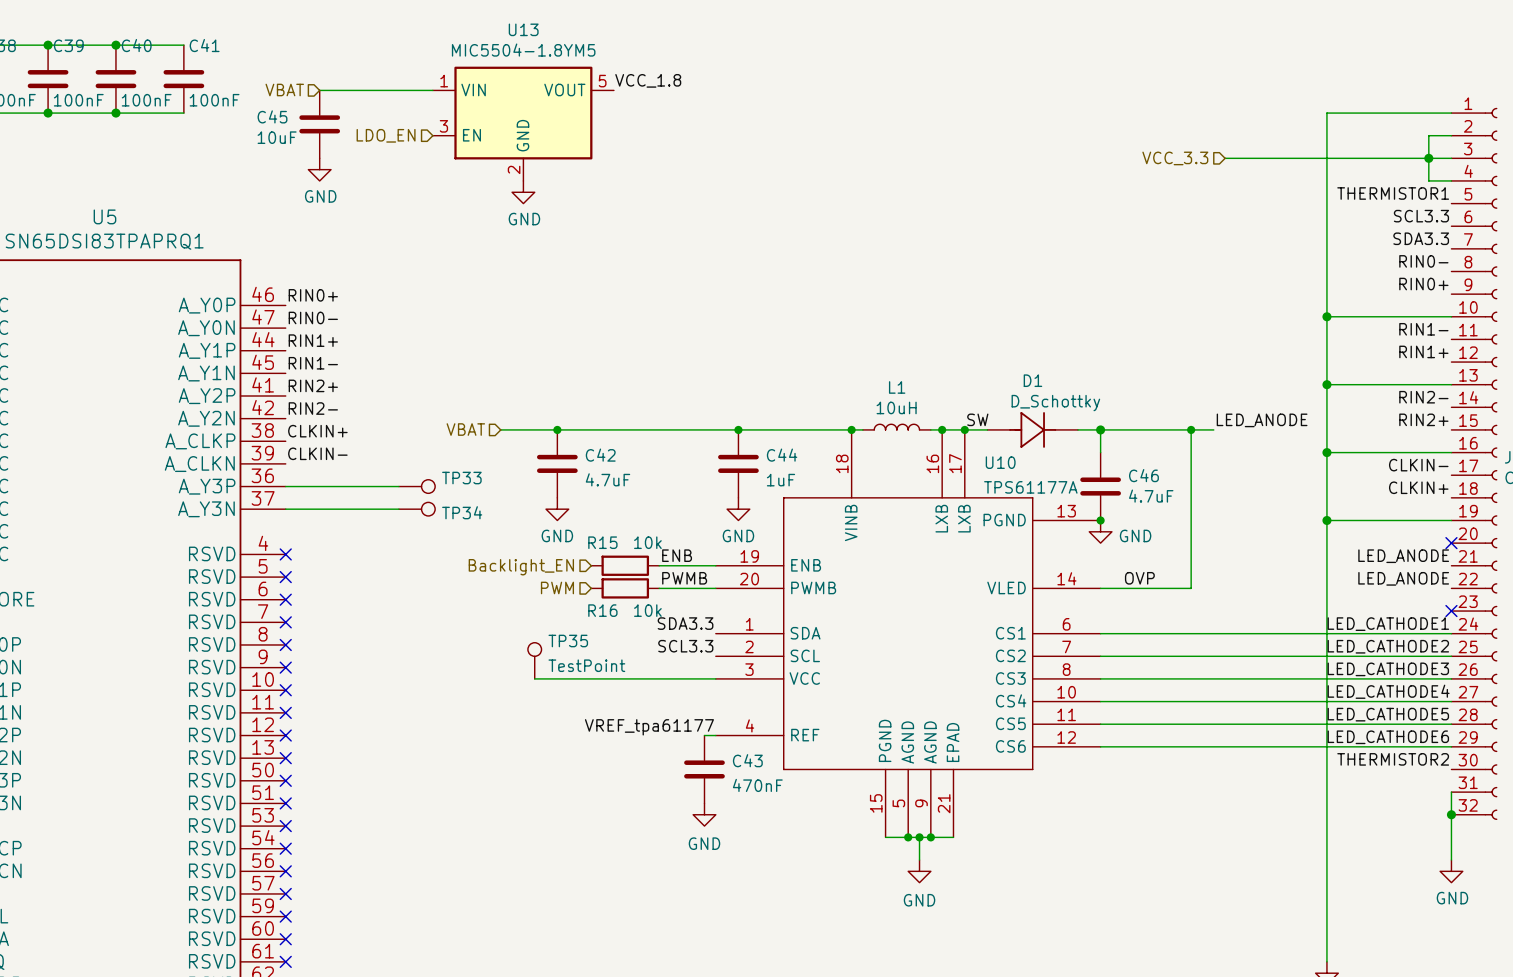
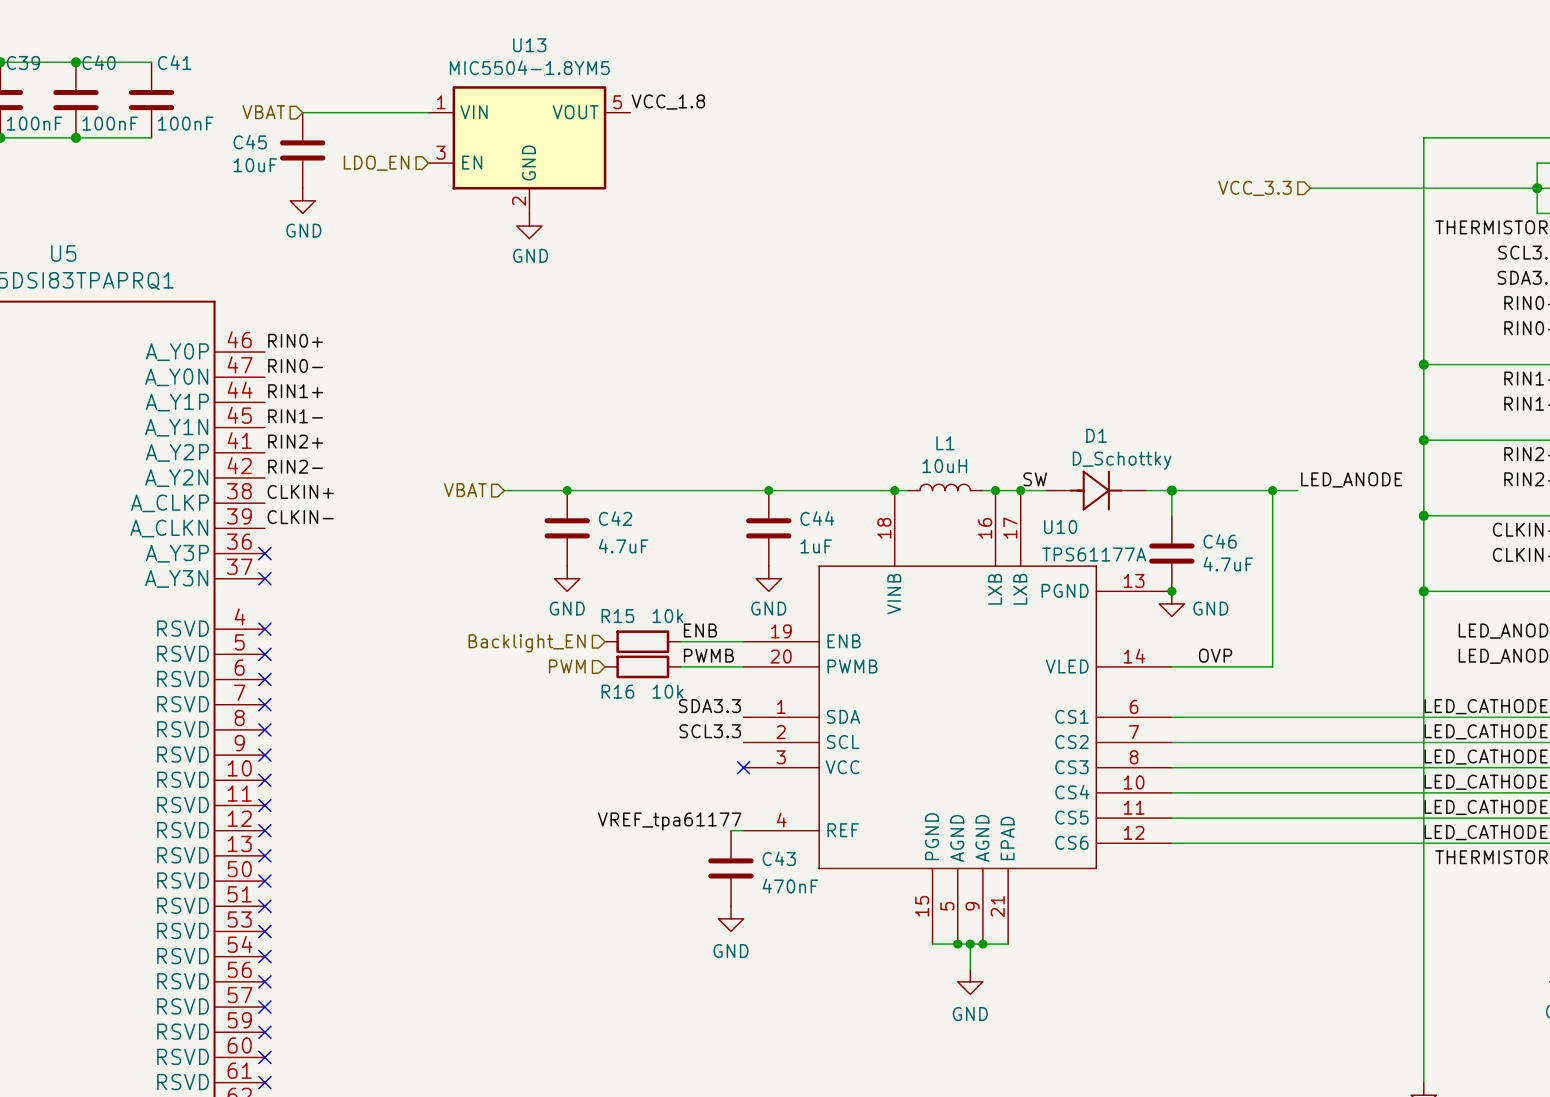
wire: (285, 486) (398, 486) -> none
no-connect mark: none -> (264, 553)
TP33: (417, 486) -> none
wire: (285, 509) (398, 509) -> none
no-connect mark: none -> (264, 578)
TP34: (417, 509) -> none
TP35: TestPoint (534, 660) -> none
wire: (534, 678) (715, 678) -> none
no-connect mark: none -> (743, 767)

